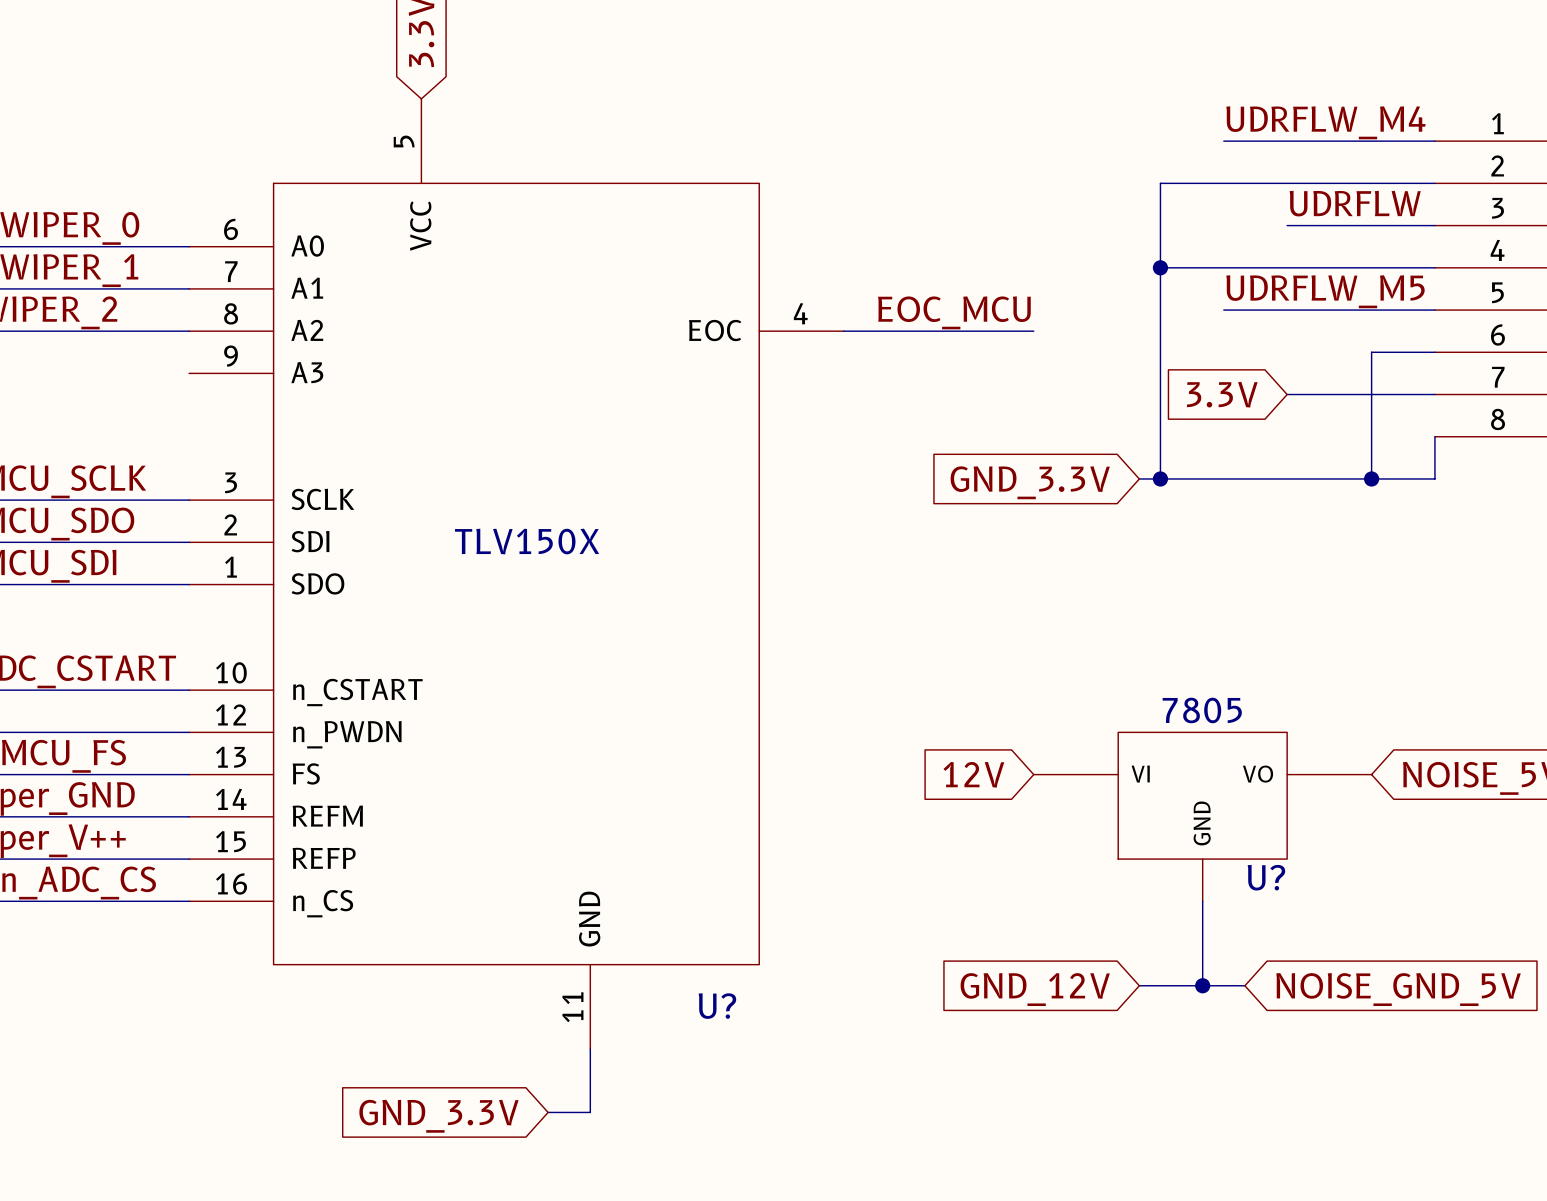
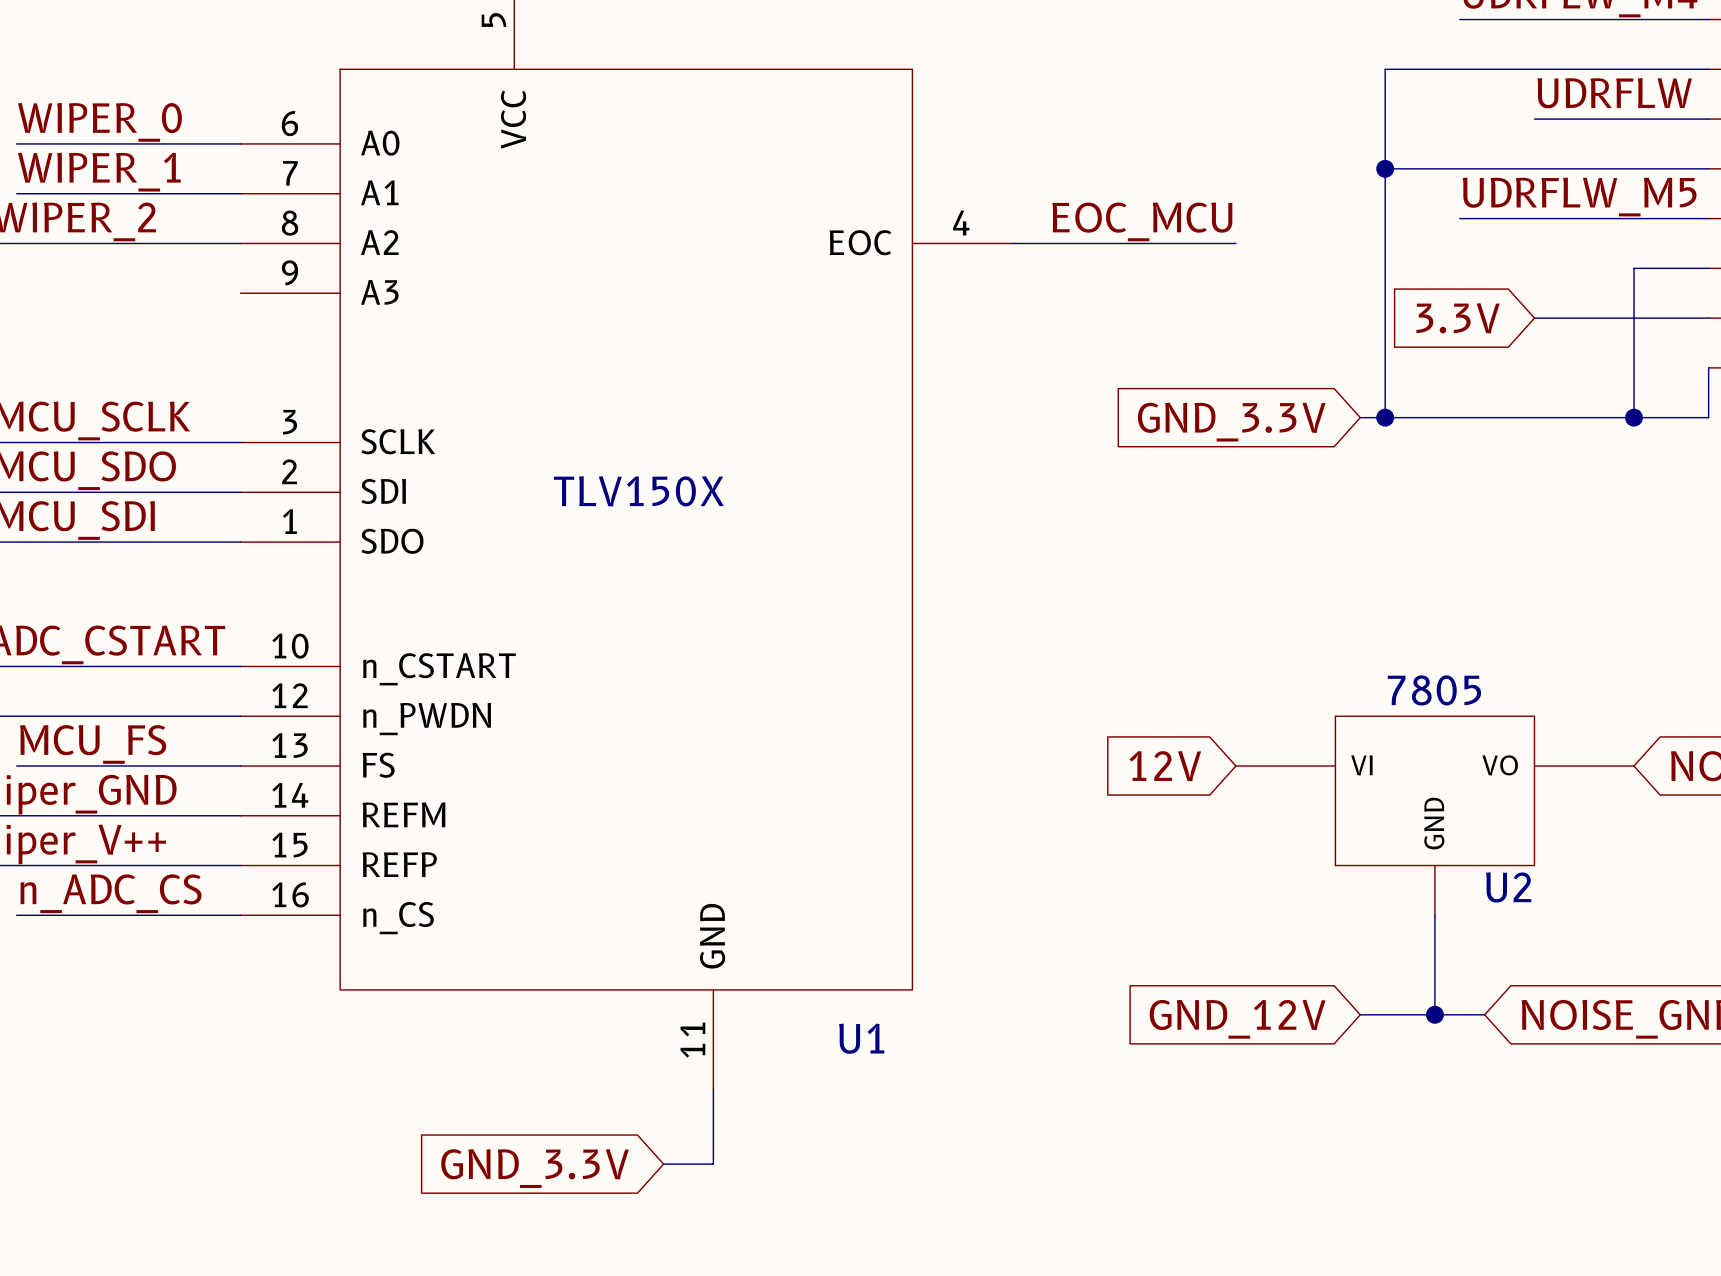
U? name: U? (1266, 877) -> U2 (1508, 887)
U? name: U? (717, 1006) -> U1 (861, 1038)

